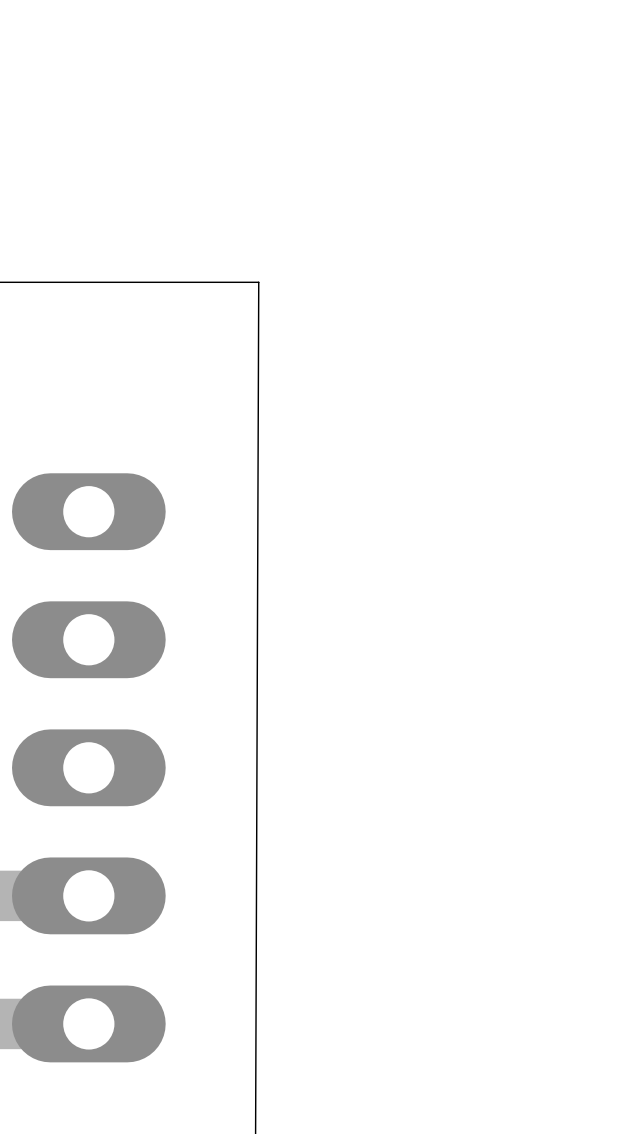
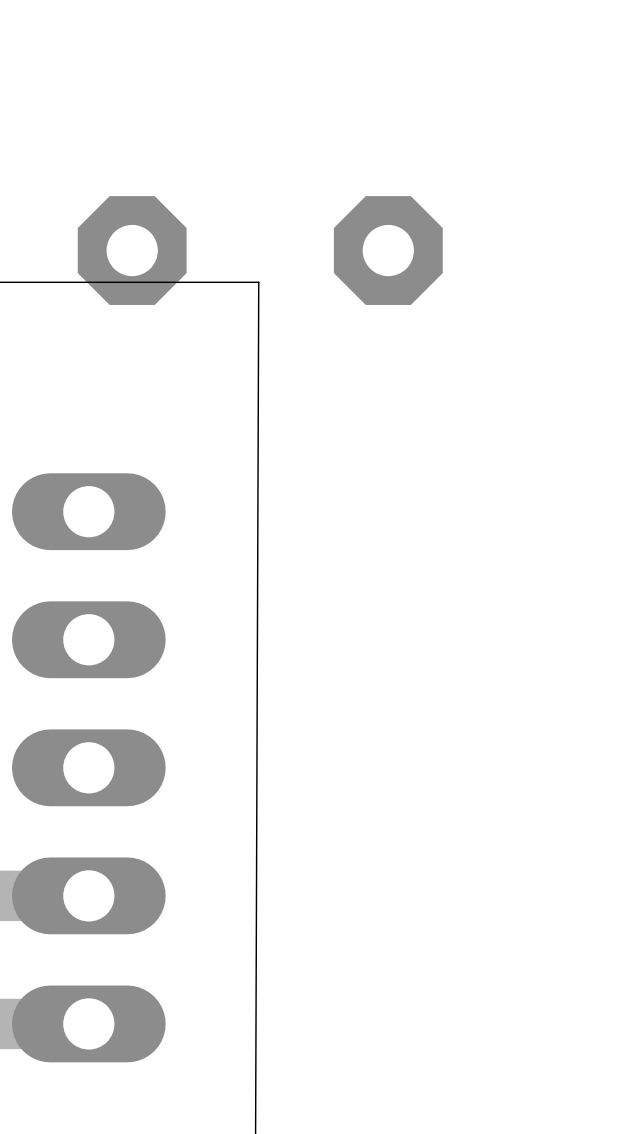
part: none -> (132, 250)
part: none -> (388, 250)

